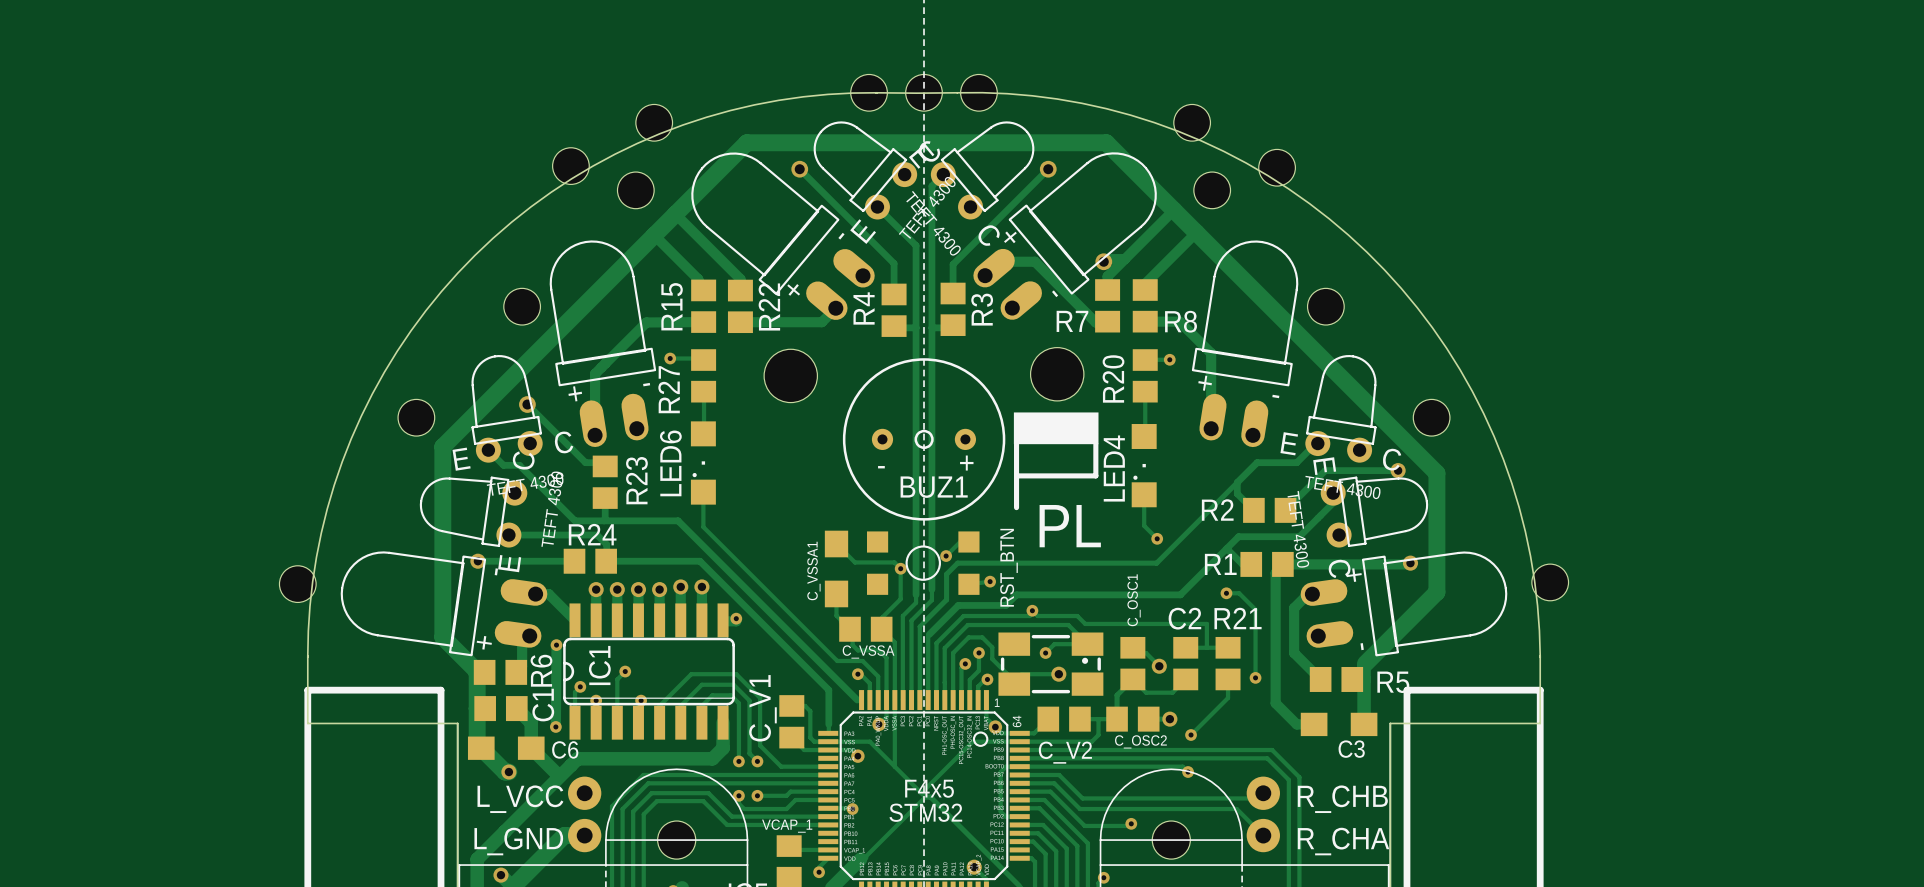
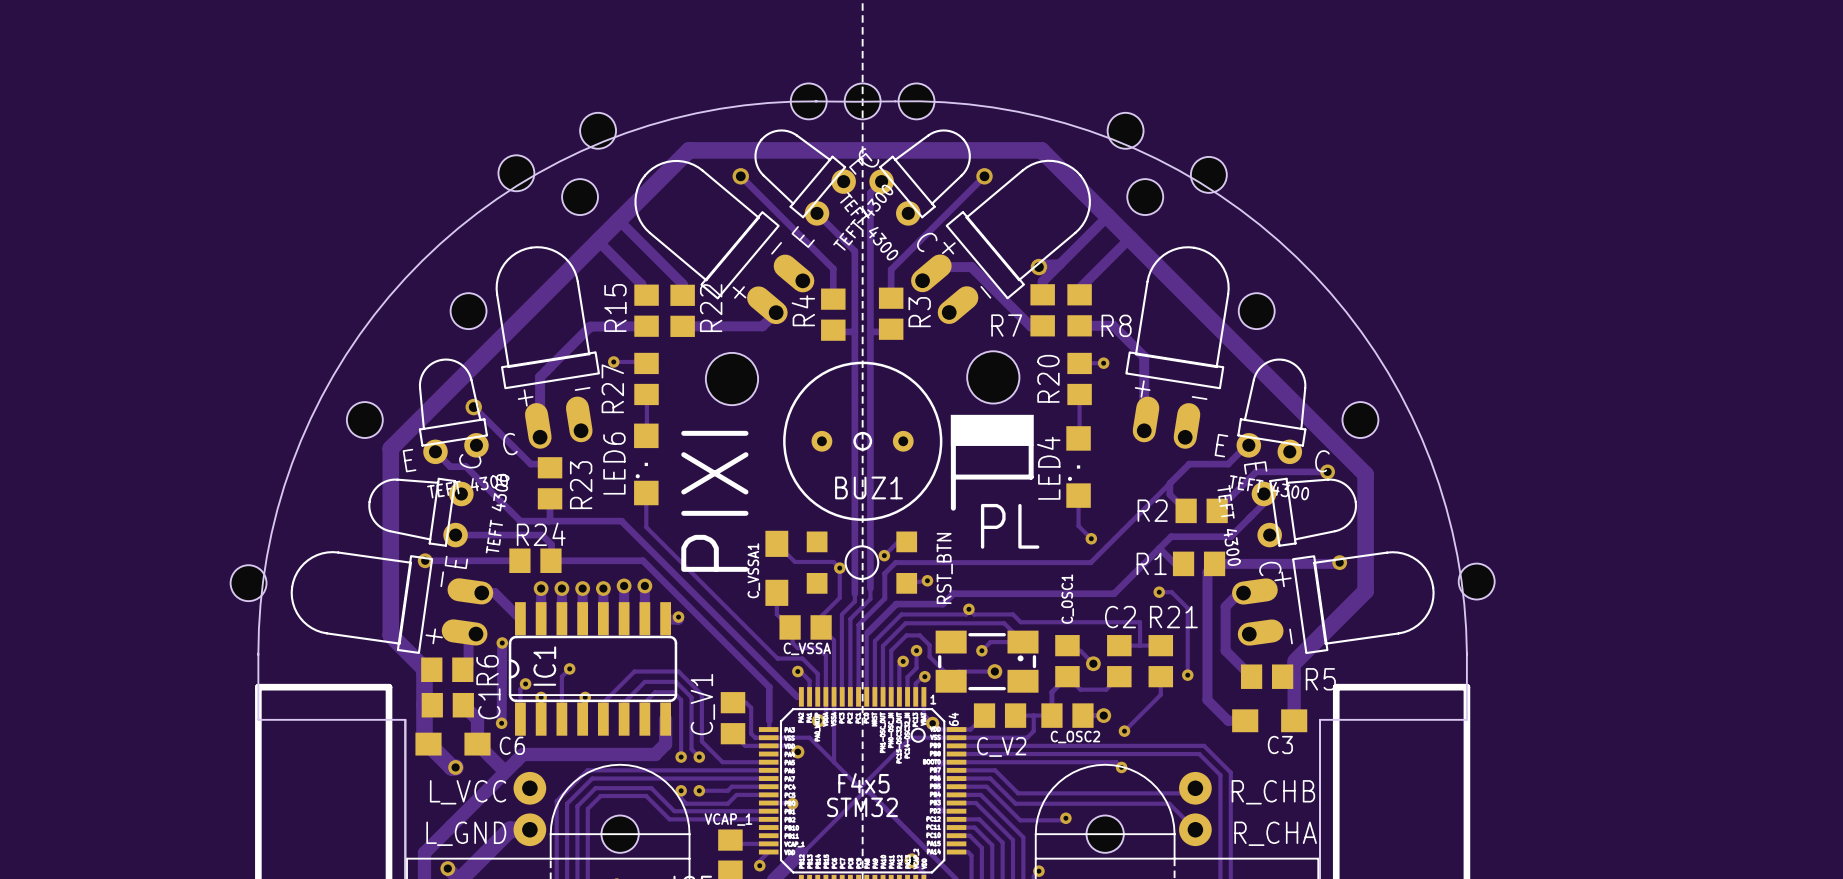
BUZ1 text: + (966, 463) -> none
BUZ1 text: - (881, 467) -> none
text: none -> PIXI (714, 501)

